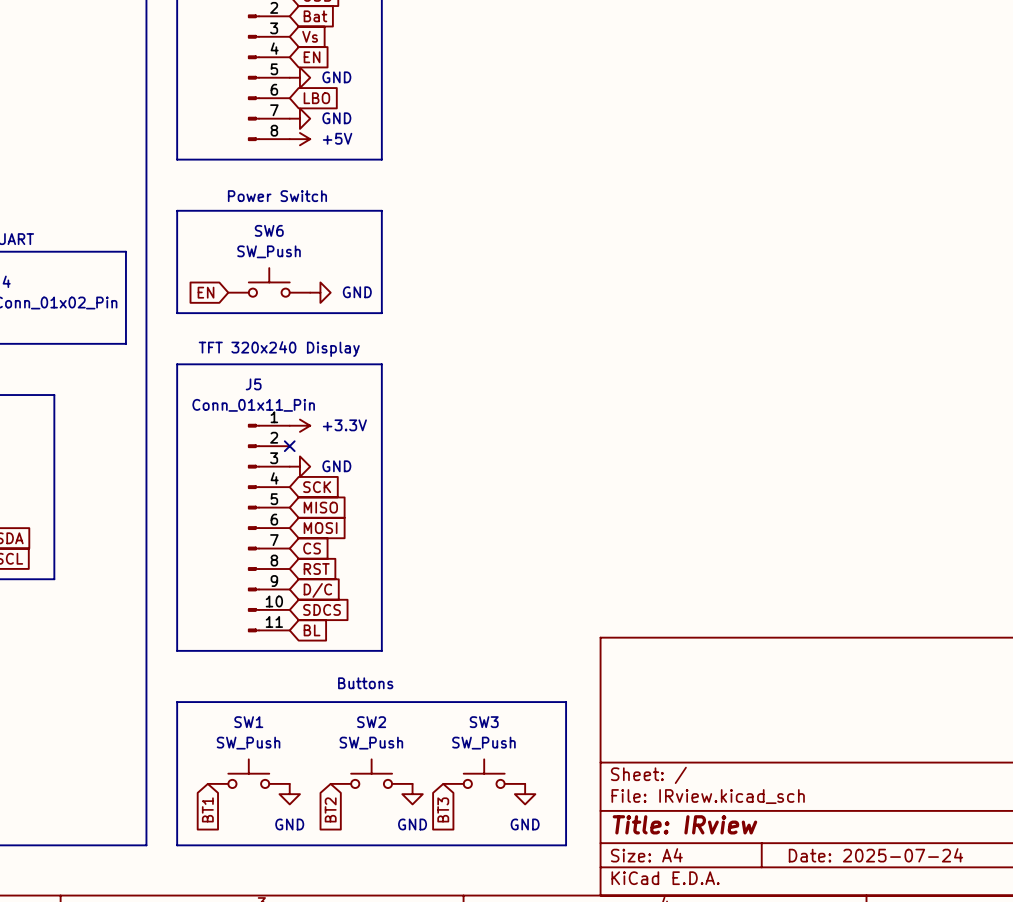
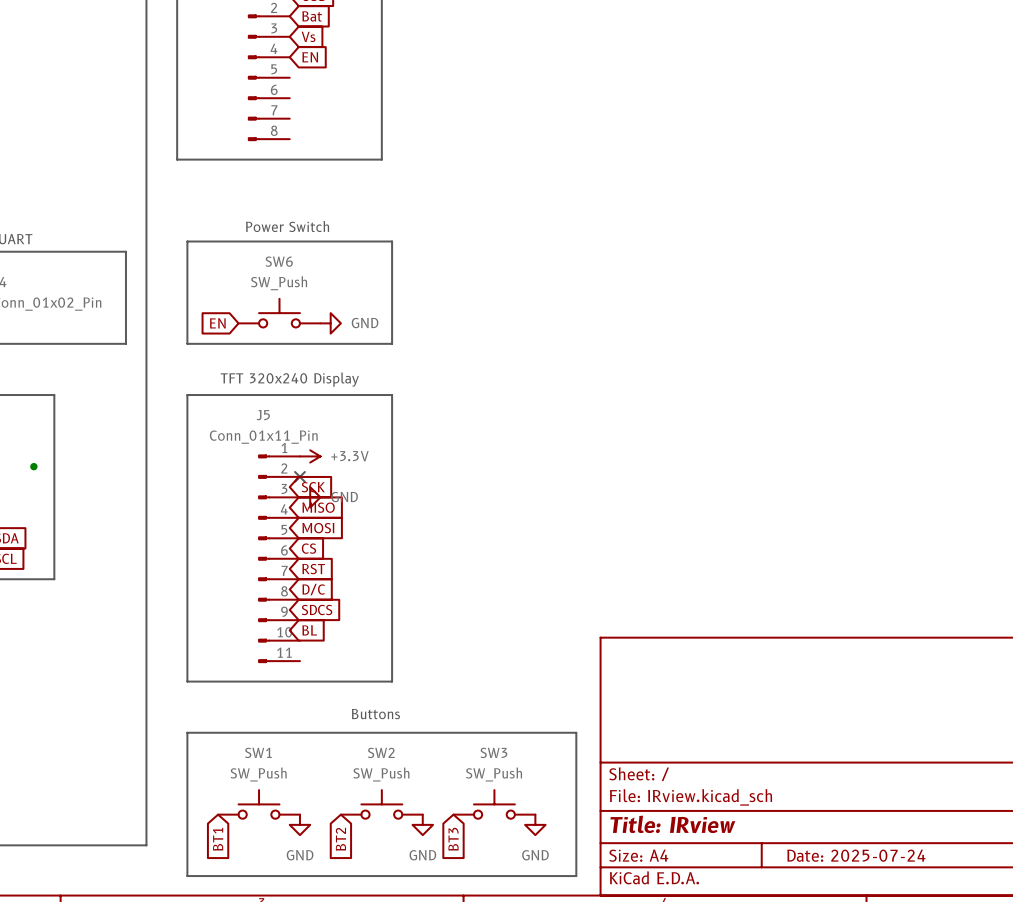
power symbol: GND (299, 77) -> none
global label: LBO (316, 98) -> none
power symbol: GND (299, 118) -> none
power symbol: +5V (299, 139) -> none
text position: Power Switch (277, 196) -> Power Switch (287, 226)
line: (177, 210) (177, 313) (381, 313) (381, 210) (177, 210) -> (187, 241) (187, 343) (392, 343) (392, 241) (187, 241)
SW6 position: (269, 282) -> (279, 313)
global label position: EN (206, 292) -> EN (217, 323)
power symbol position: GND (320, 292) -> GND (330, 323)
text position: TFT 320x240 Display (279, 349) -> TFT 320x240 Display (289, 379)
line: (177, 364) (381, 364) (381, 650) (177, 650) (177, 364) -> (187, 395) (392, 395) (392, 681) (187, 681) (187, 395)
power symbol position: +3.3V (299, 425) -> +3.3V (310, 456)
no-connect mark position: (289, 446) -> (299, 476)
junction: none -> (33, 466)
power symbol position: GND (299, 466) -> GND (310, 497)
J5 position: (268, 528) -> (279, 558)
text position: Buttons (365, 683) -> Buttons (375, 714)
line: (177, 702) (177, 845) (566, 845) (566, 702) (177, 702) -> (187, 732) (187, 876) (576, 876) (576, 732) (187, 732)
SW1 position: (248, 773) -> (259, 804)
SW2 position: (371, 773) -> (381, 804)
SW3 position: (484, 773) -> (494, 804)
power symbol position: GND (289, 794) -> GND (299, 824)
power symbol position: GND (412, 794) -> GND (422, 824)
power symbol position: GND (525, 794) -> GND (535, 824)
global label position: BT1 (207, 809) -> BT1 (218, 839)
global label position: BT2 (330, 809) -> BT2 (340, 839)
global label position: BT3 (443, 809) -> BT3 (453, 839)

